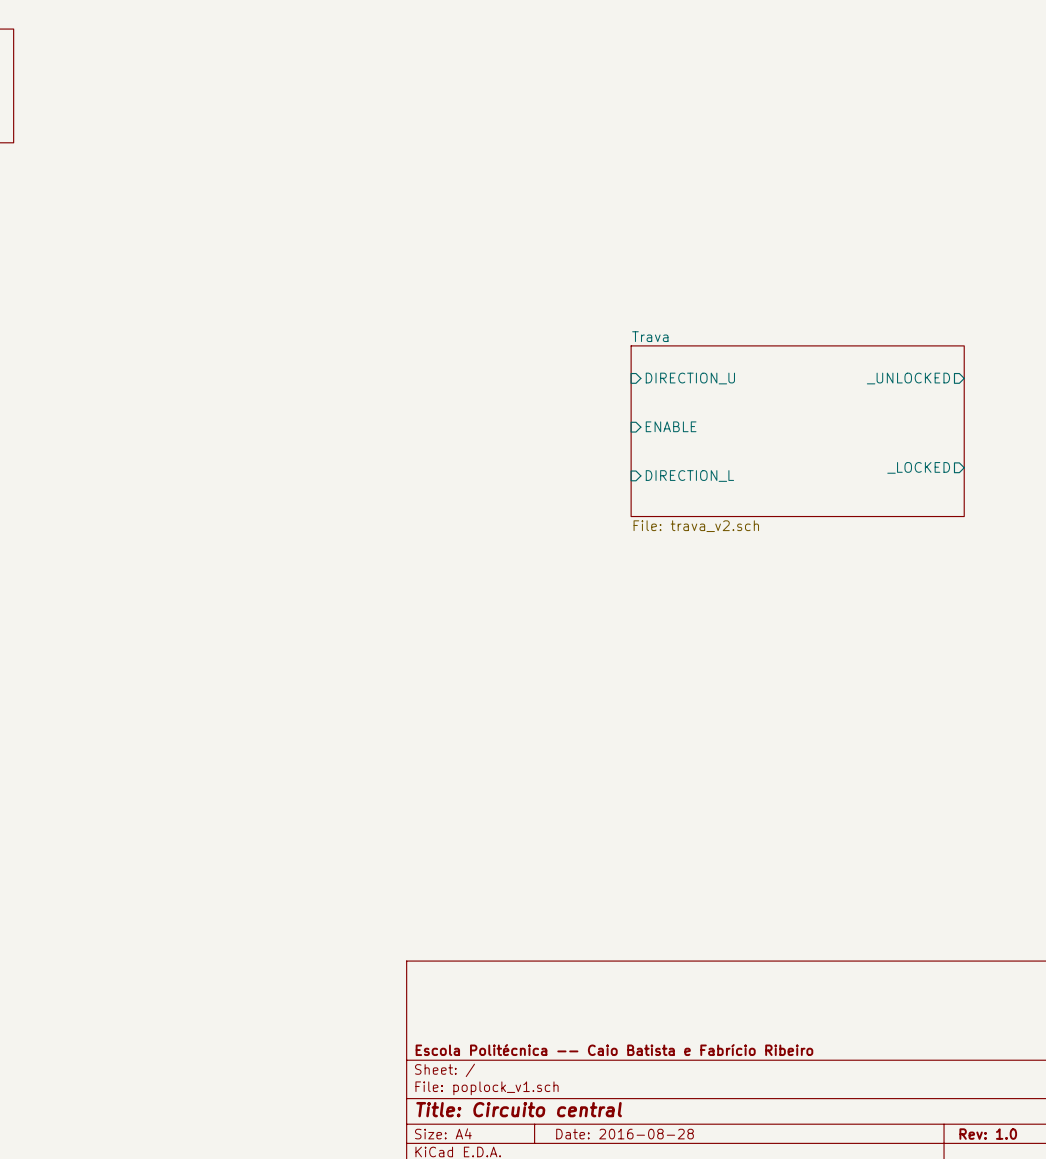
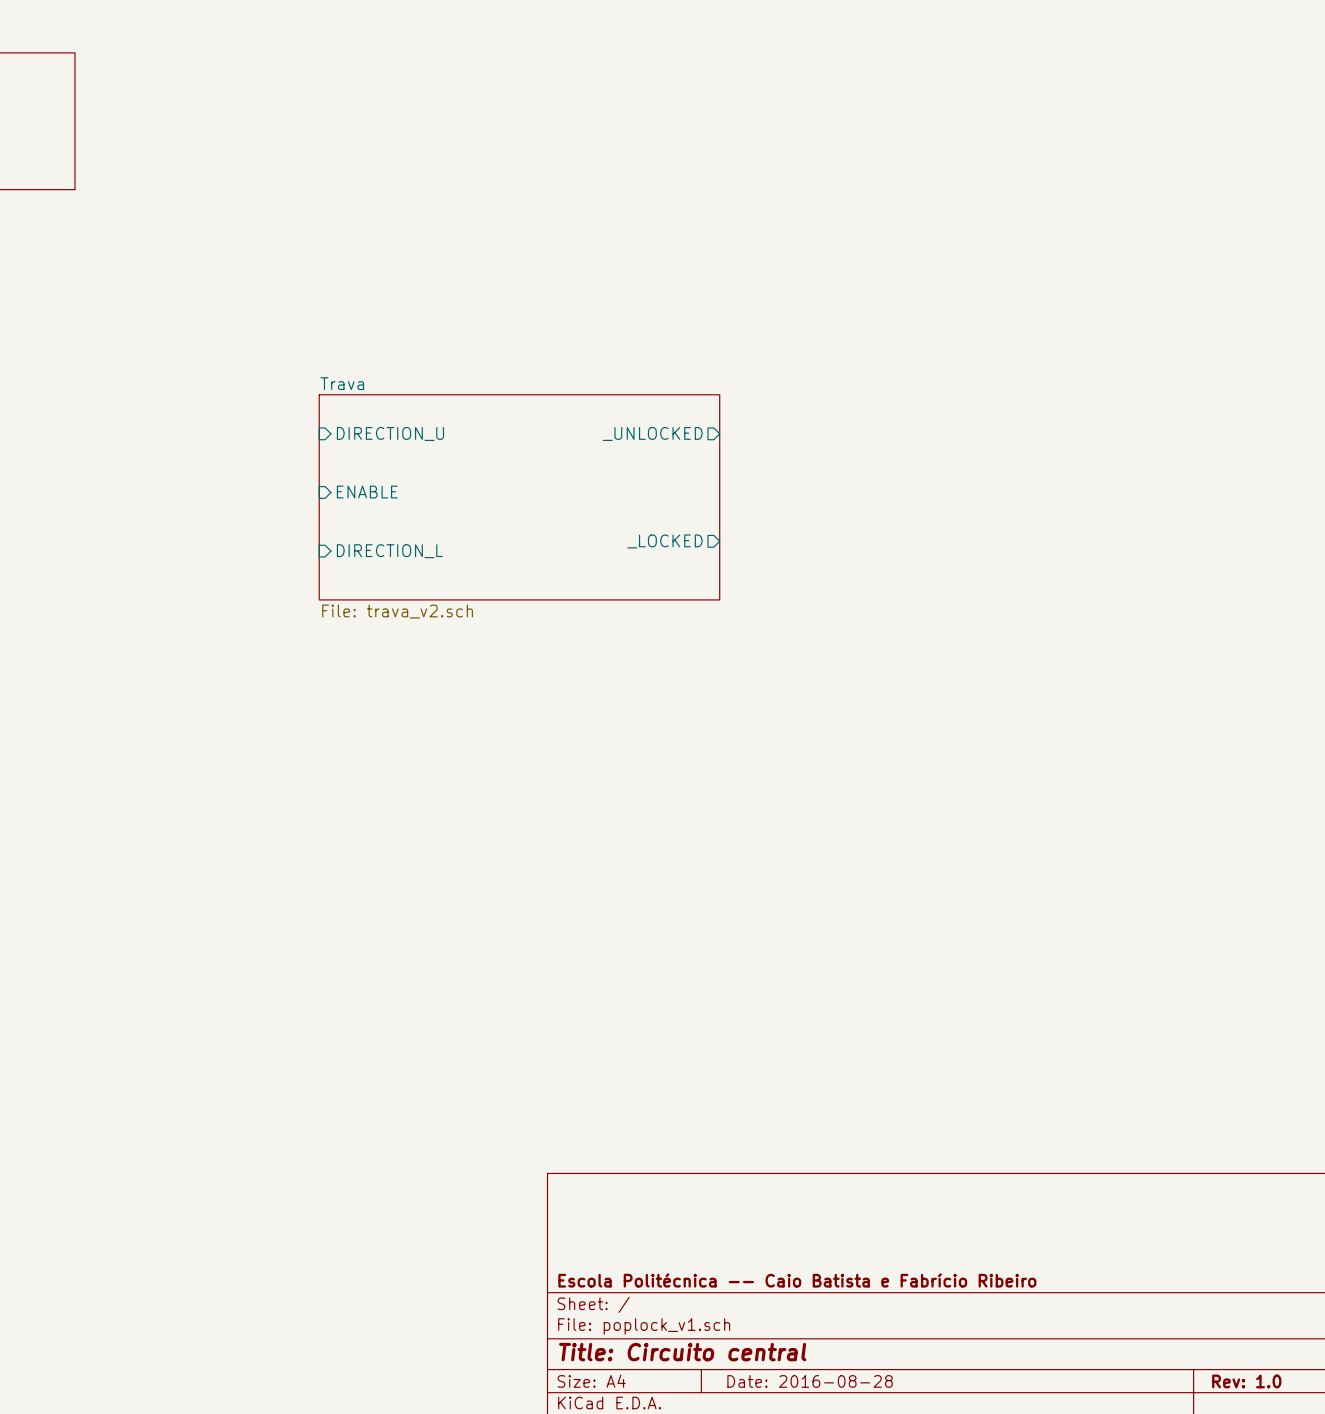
sheet pin: none -> DIRECTION_U (390, 433)
sheet pin: none -> _UNLOCKED (652, 433)
sheet pin: DIRECTION_U (690, 378) -> none
sheet pin: _UNLOCKED (908, 378) -> none
sheet pin: none -> ENABLE (367, 492)
sheet Trava: none -> File: trava_v2.sch (519, 497)
sheet pin: ENABLE (671, 426) -> none
sheet Trava: File: trava_v2.sch (797, 431) -> none
sheet pin: none -> _LOCKED (664, 541)
sheet pin: none -> DIRECTION_L (389, 551)
sheet pin: _LOCKED (918, 467) -> none
sheet pin: DIRECTION_L (689, 476) -> none

